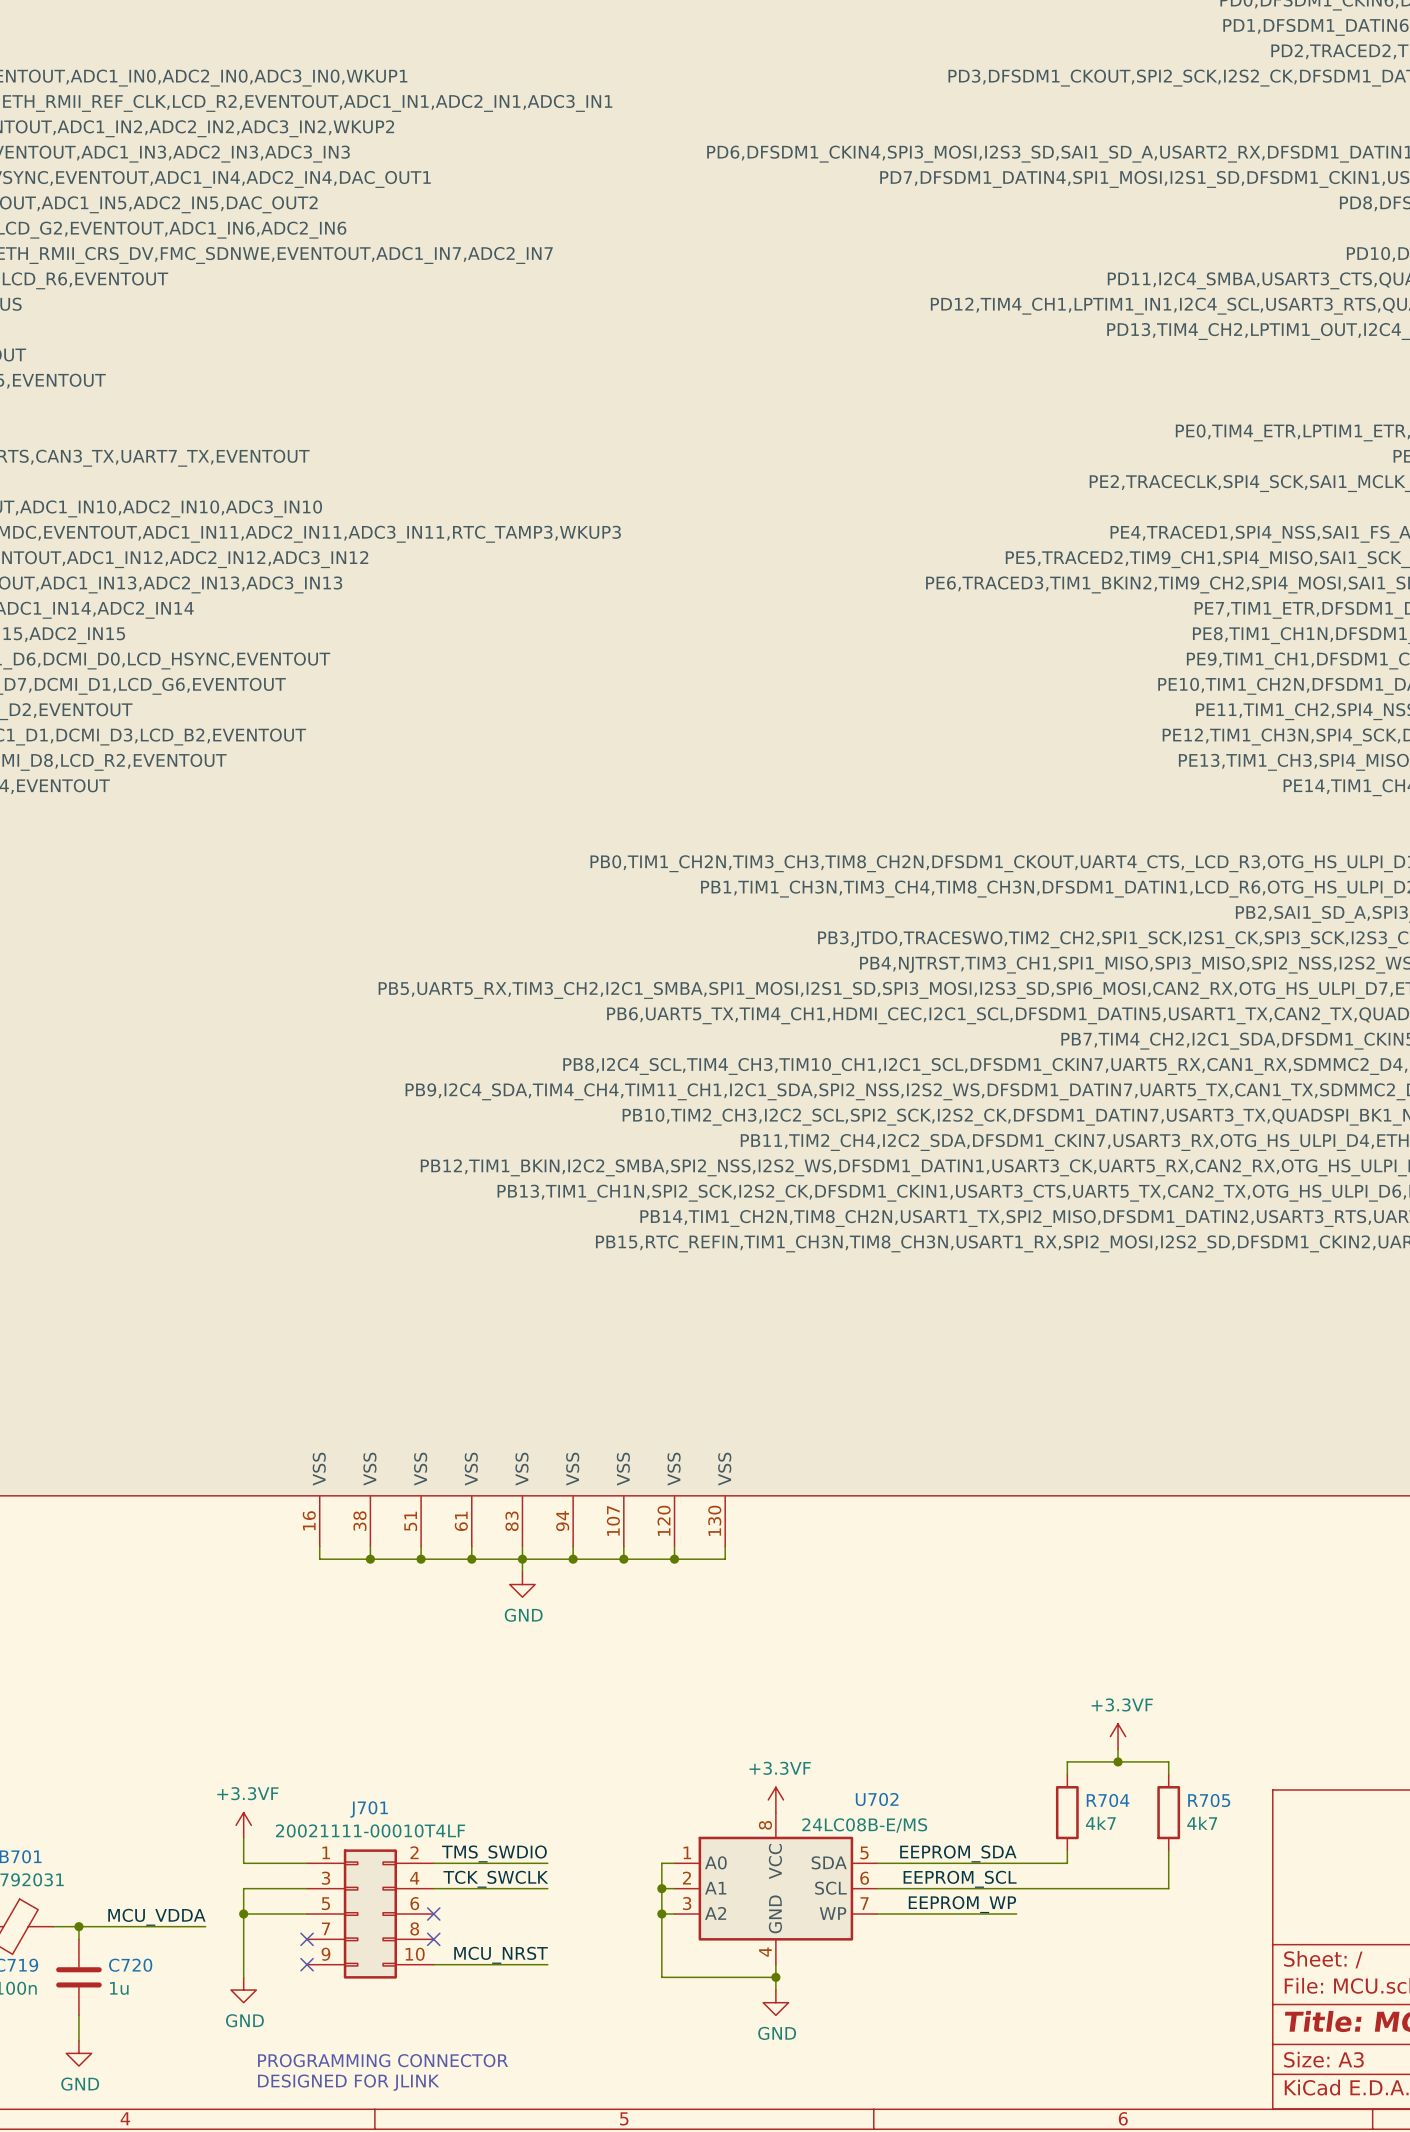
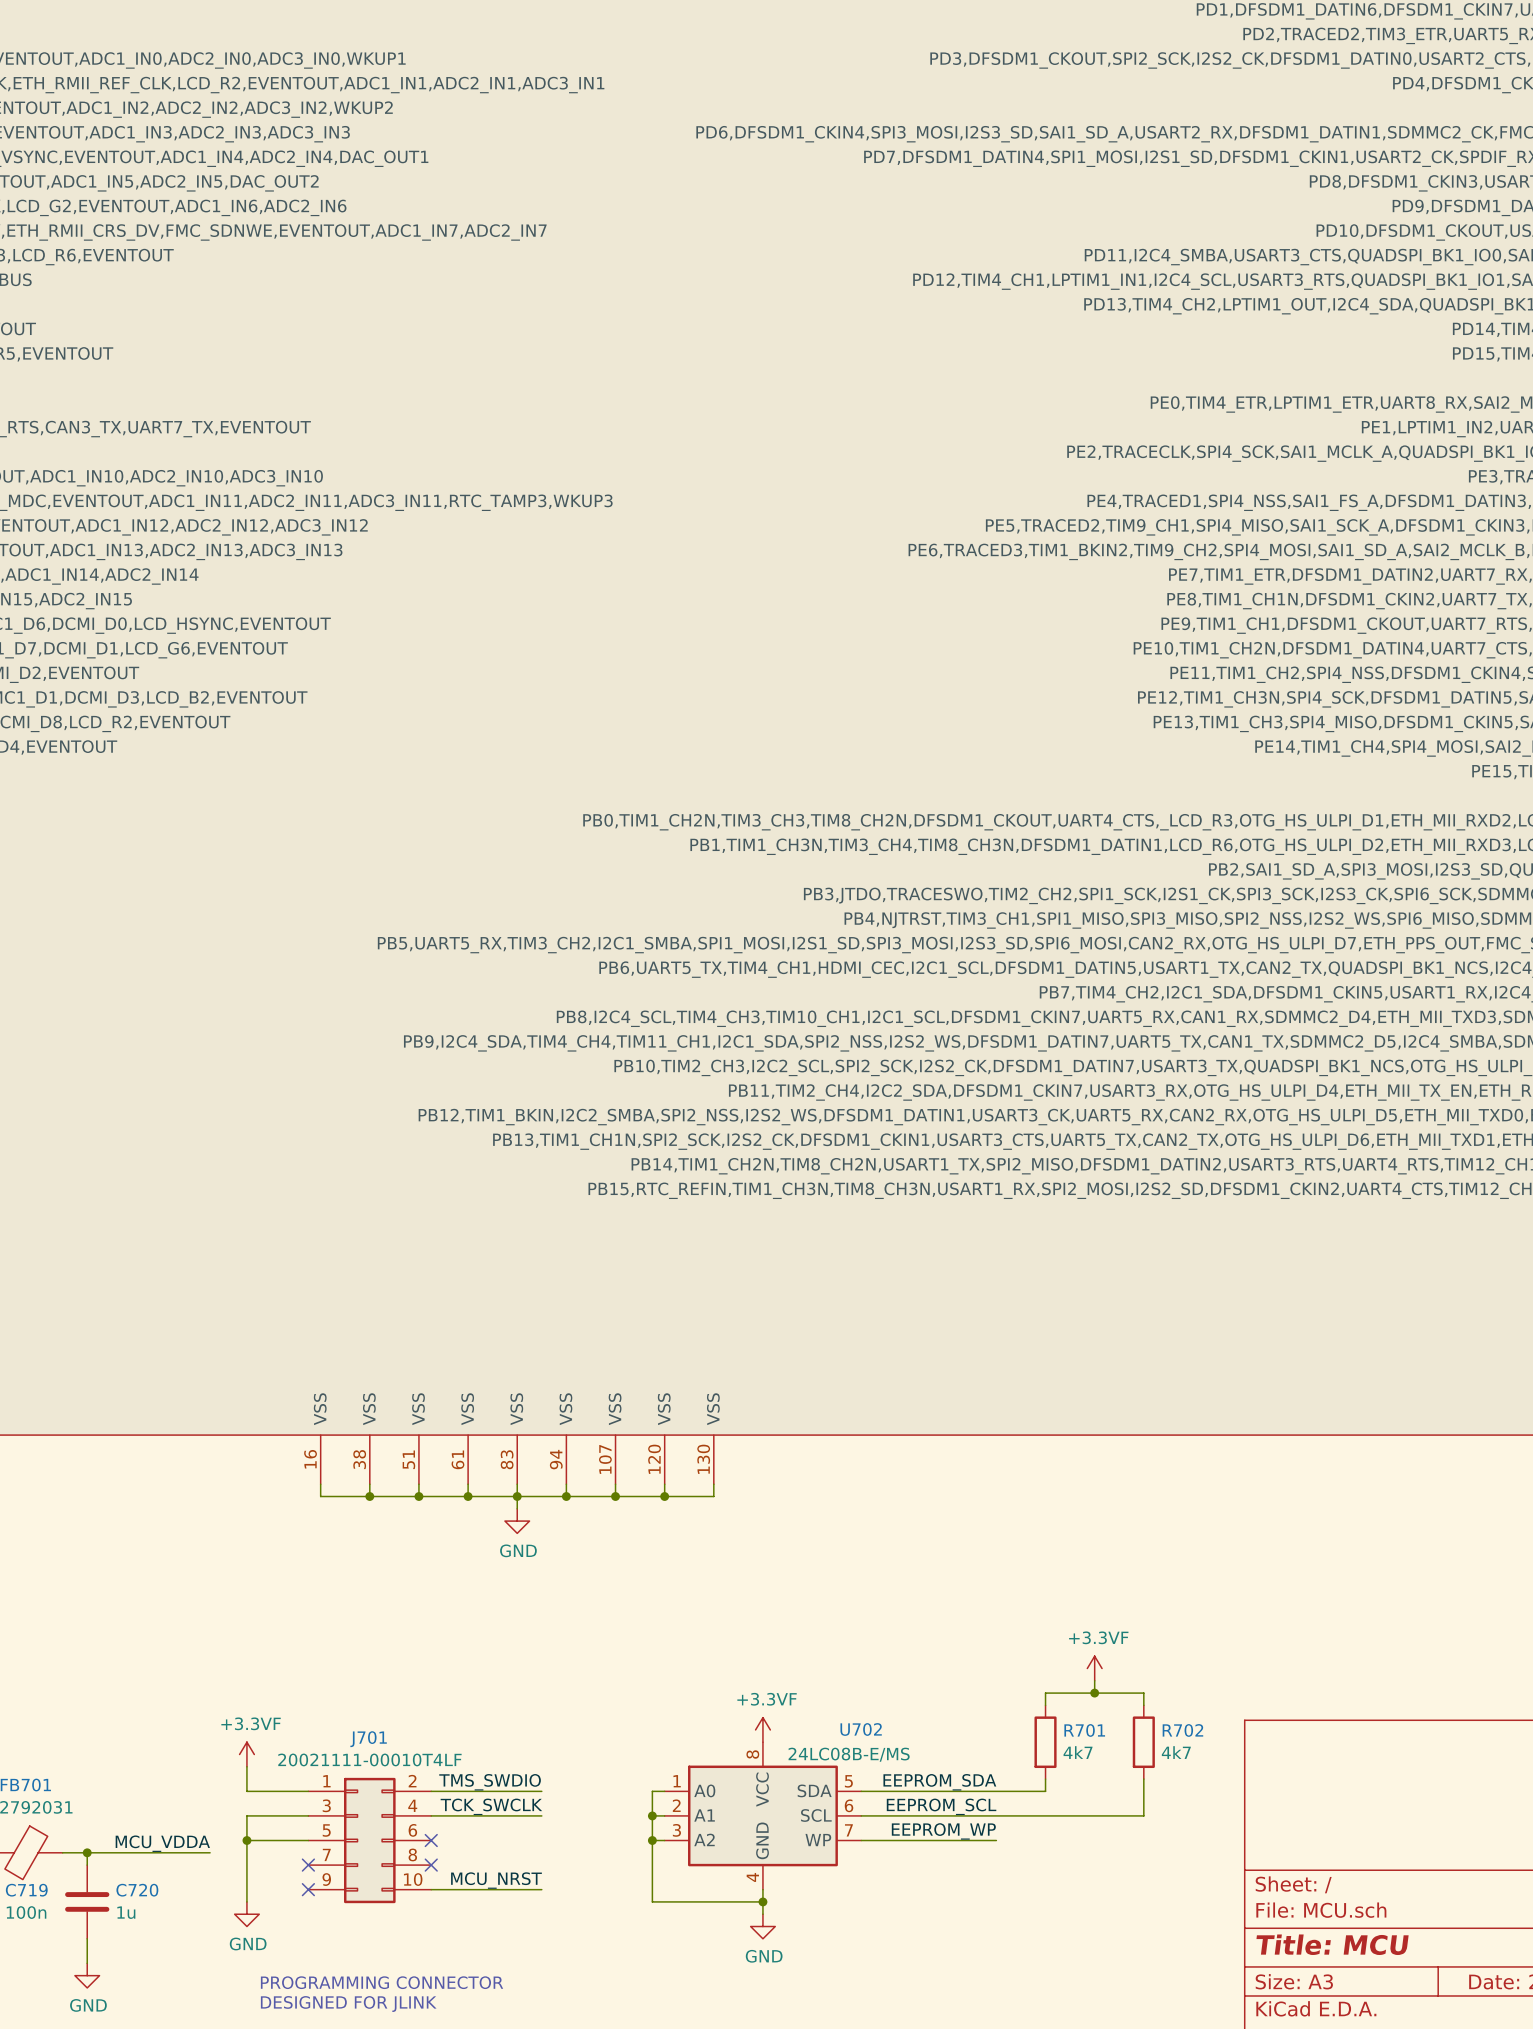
R704 name: R704 (1108, 1800) -> R701 (1084, 1730)
R705 name: R705 (1209, 1800) -> R702 (1182, 1730)

